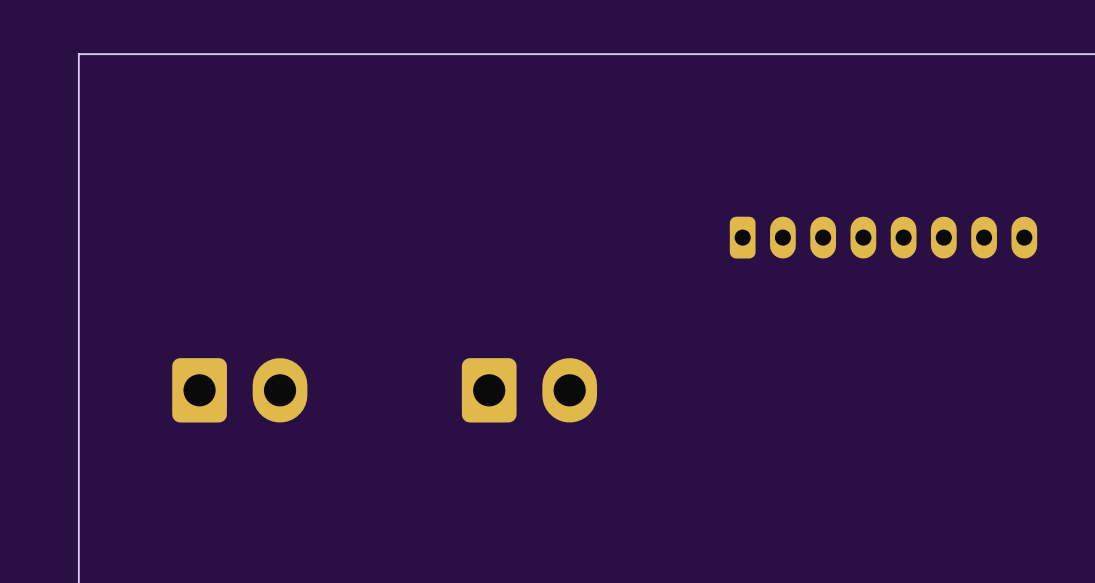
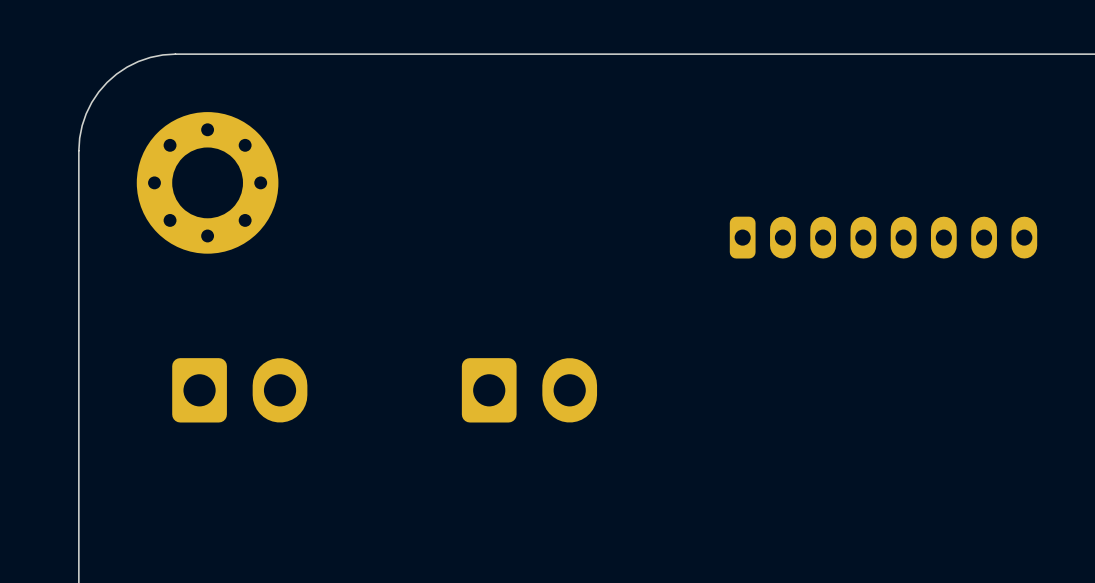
board edge: (175, 54) (78, 54) (78, 150) -> (175, 54) (150, 57) (138, 61) (116, 74) (107, 82) (98, 91) (86, 113) (82, 125) (78, 150)
part: none -> (207, 182)

